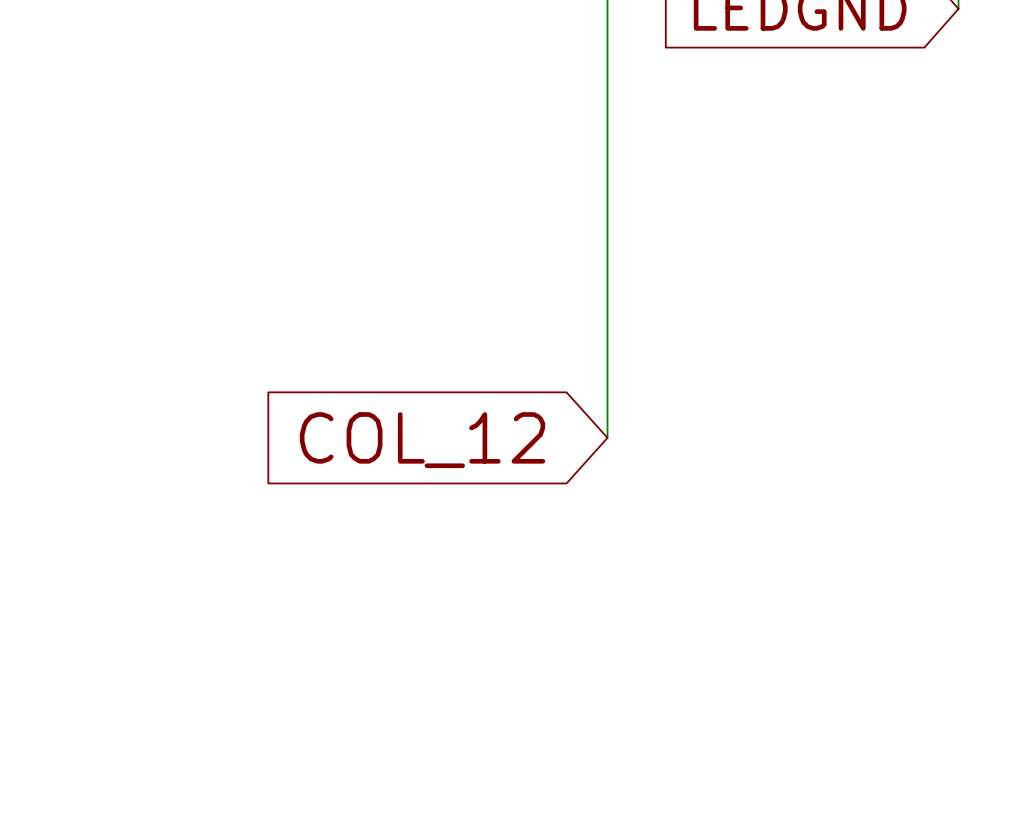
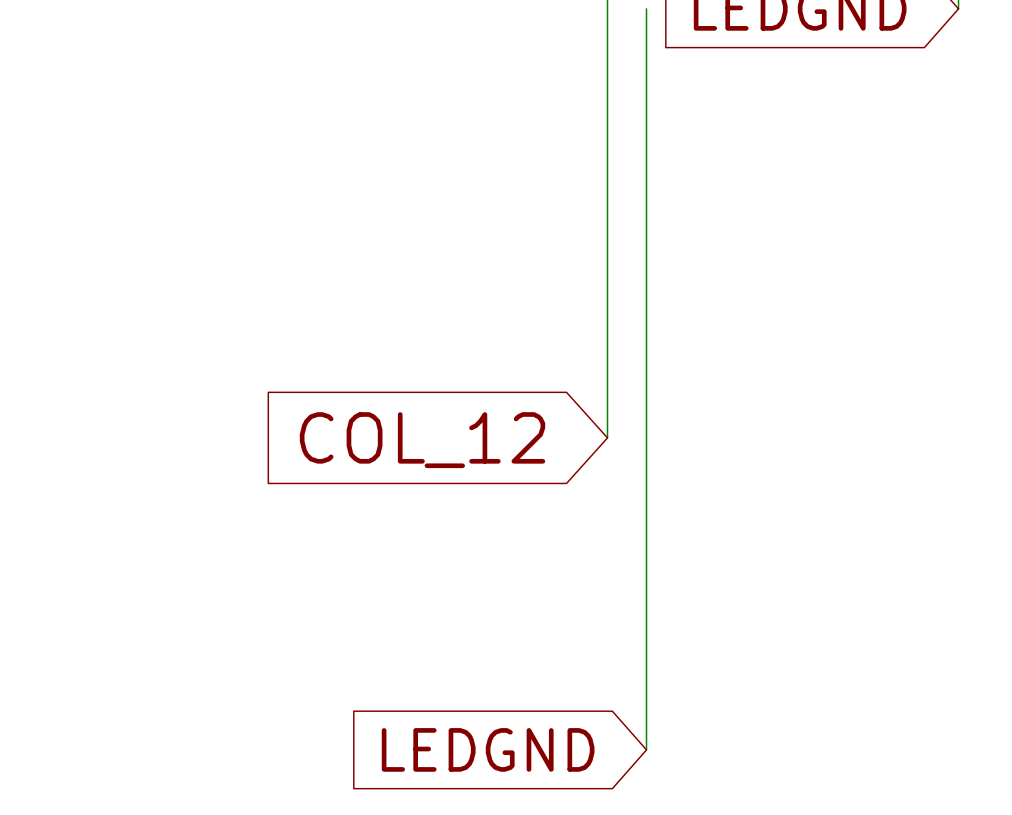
wire: none -> (646, 8) (646, 749)
global label: none -> LEDGND (488, 749)

